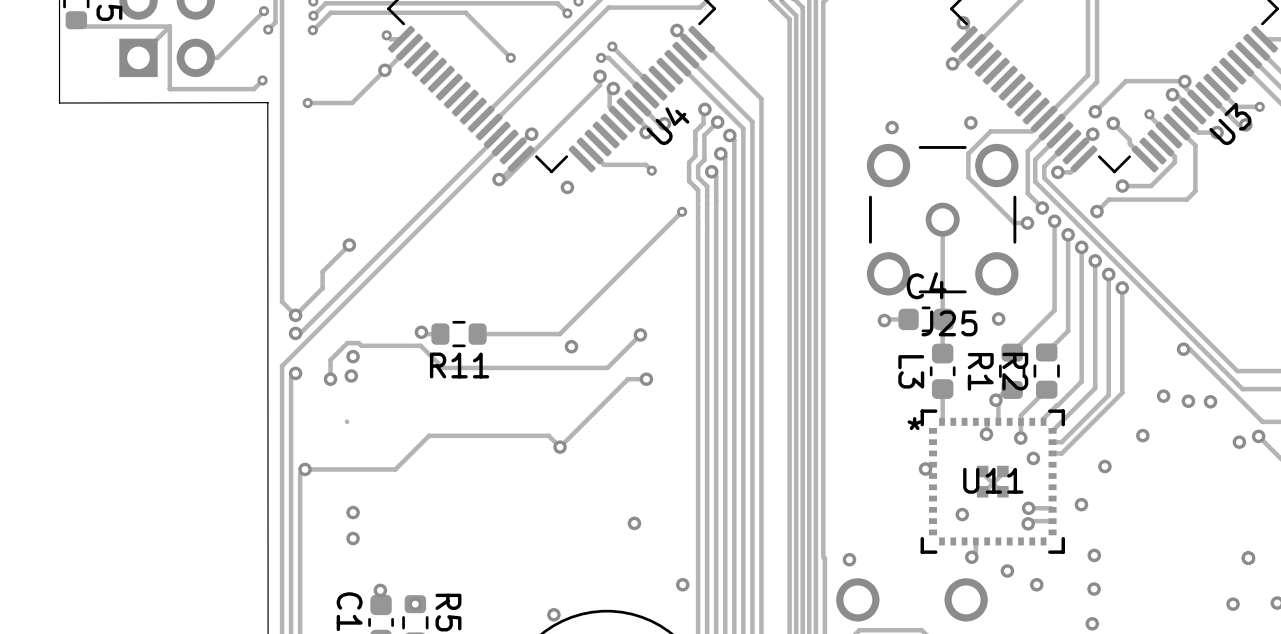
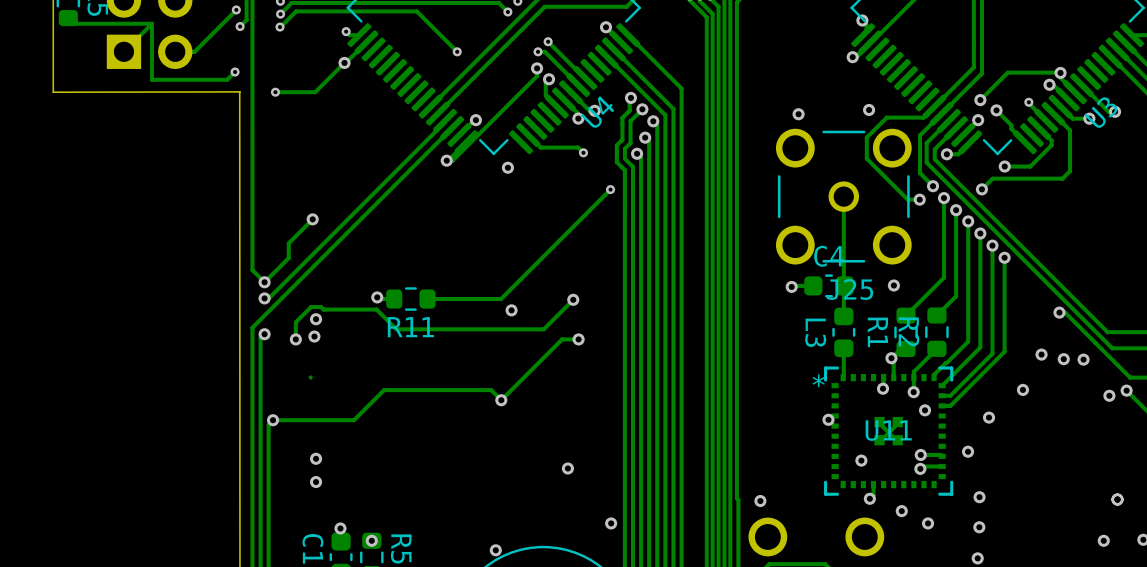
track: (1216, 87) (1236, 106) (1259, 106) -> none
via: (1259, 106) -> none

